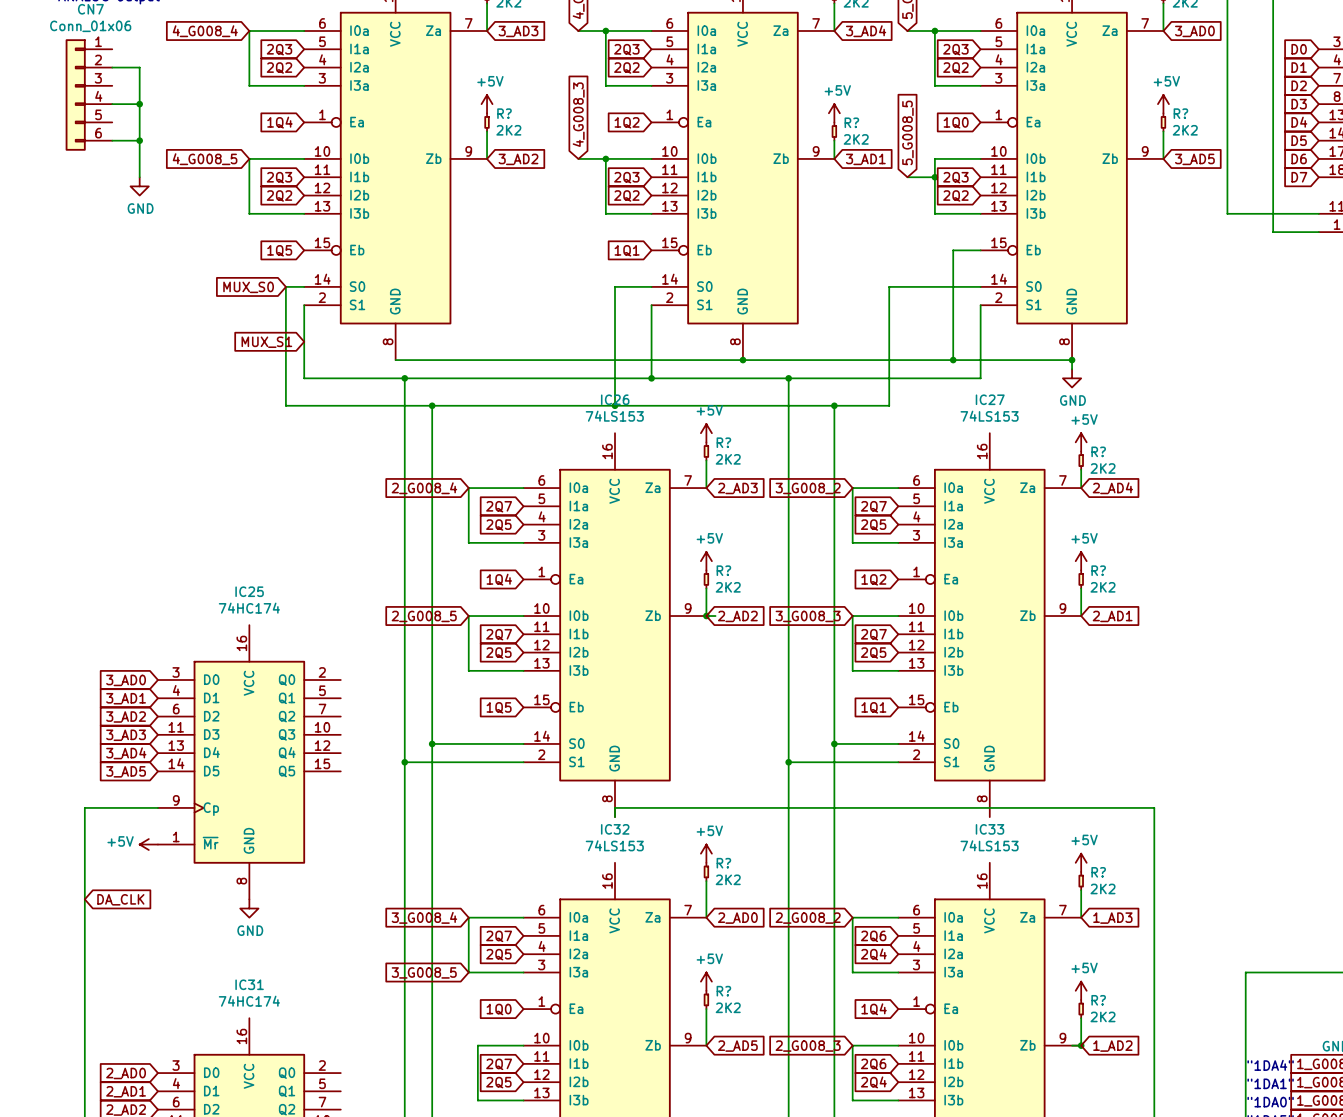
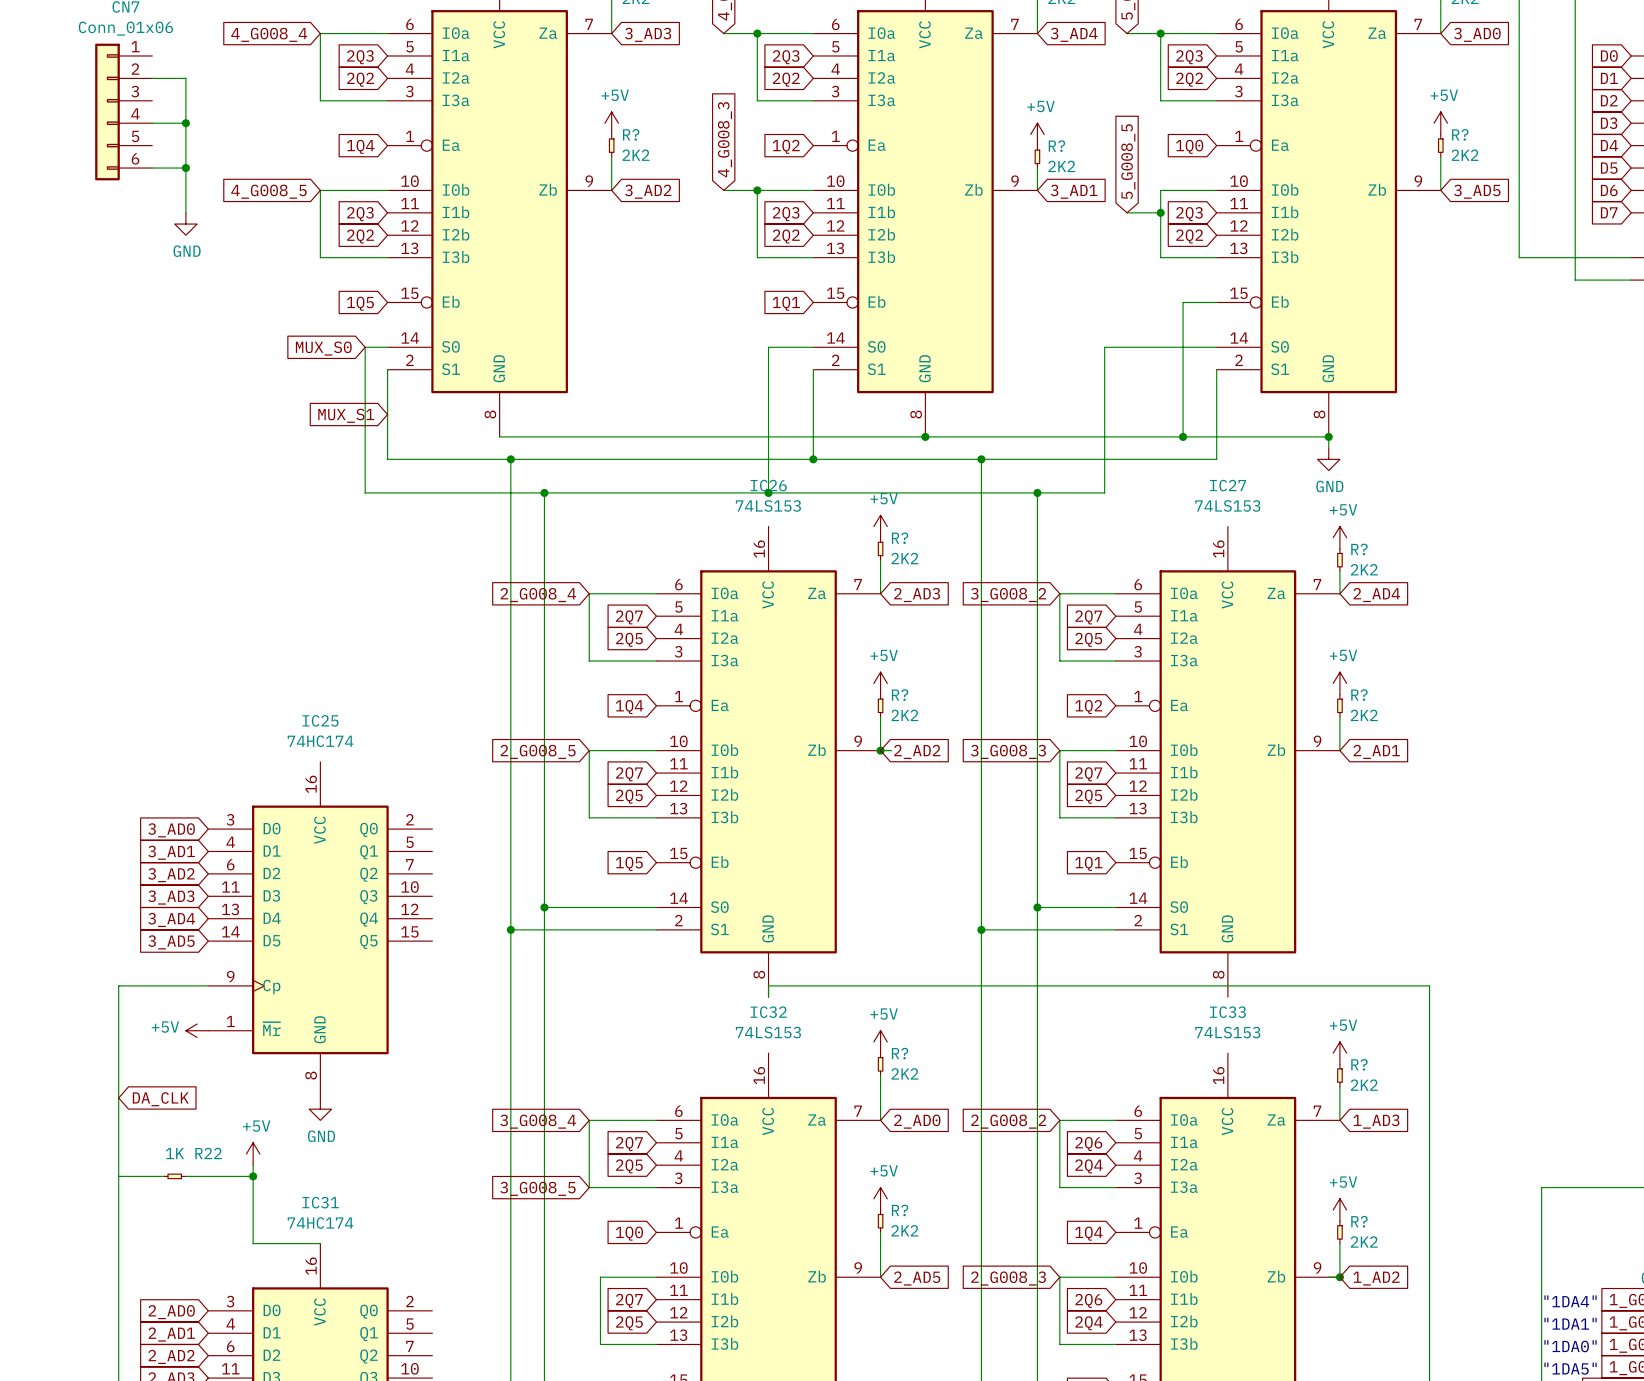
power symbol: none -> +5V (253, 1153)
wire: none -> (253, 1165) (253, 1243) (320, 1243)
wire: none -> (118, 1176) (163, 1176)
R22: none -> 1K (174, 1176)
wire: none -> (185, 1176) (253, 1176)
junction: none -> (253, 1176)

